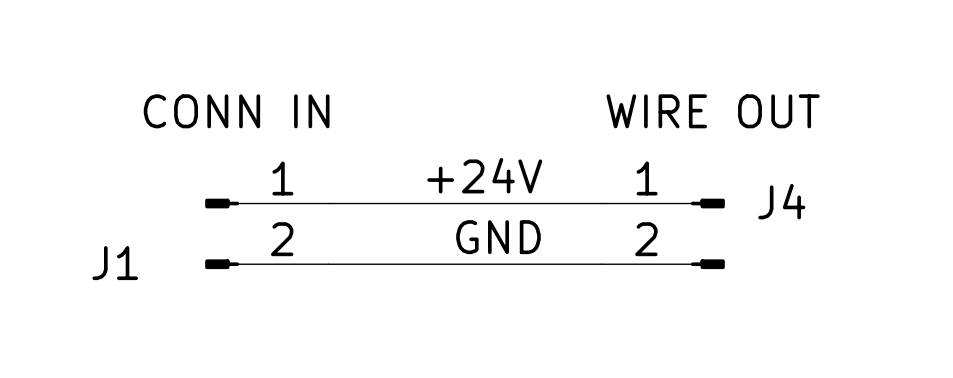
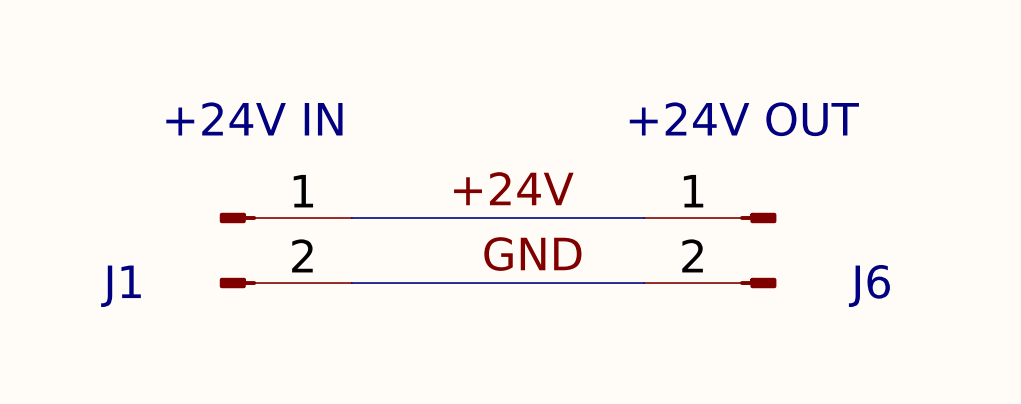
J1 value: CONN IN (236, 111) -> +24V IN (254, 118)
J4 value: WIRE OUT (713, 111) -> +24V OUT (744, 119)
J4 name: J4 (781, 201) -> J6 (869, 285)

